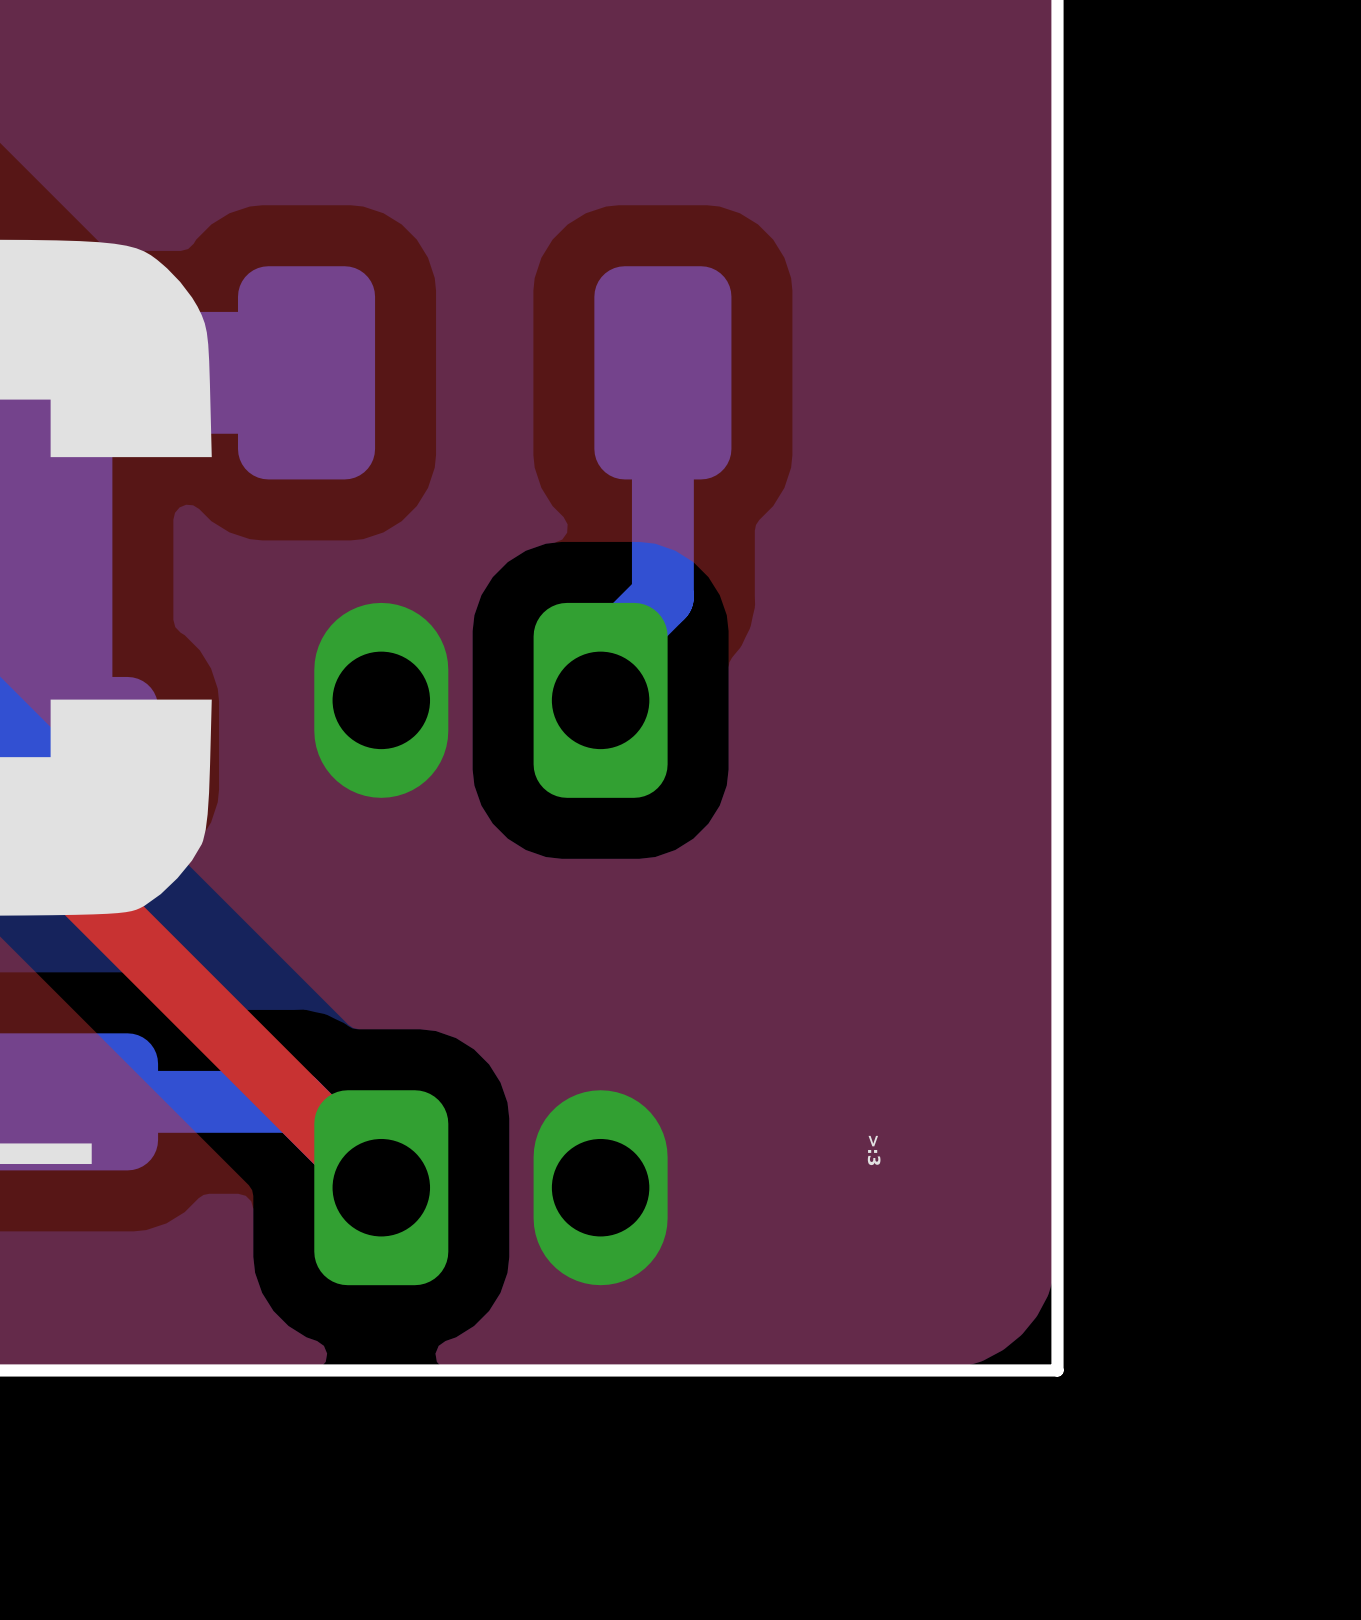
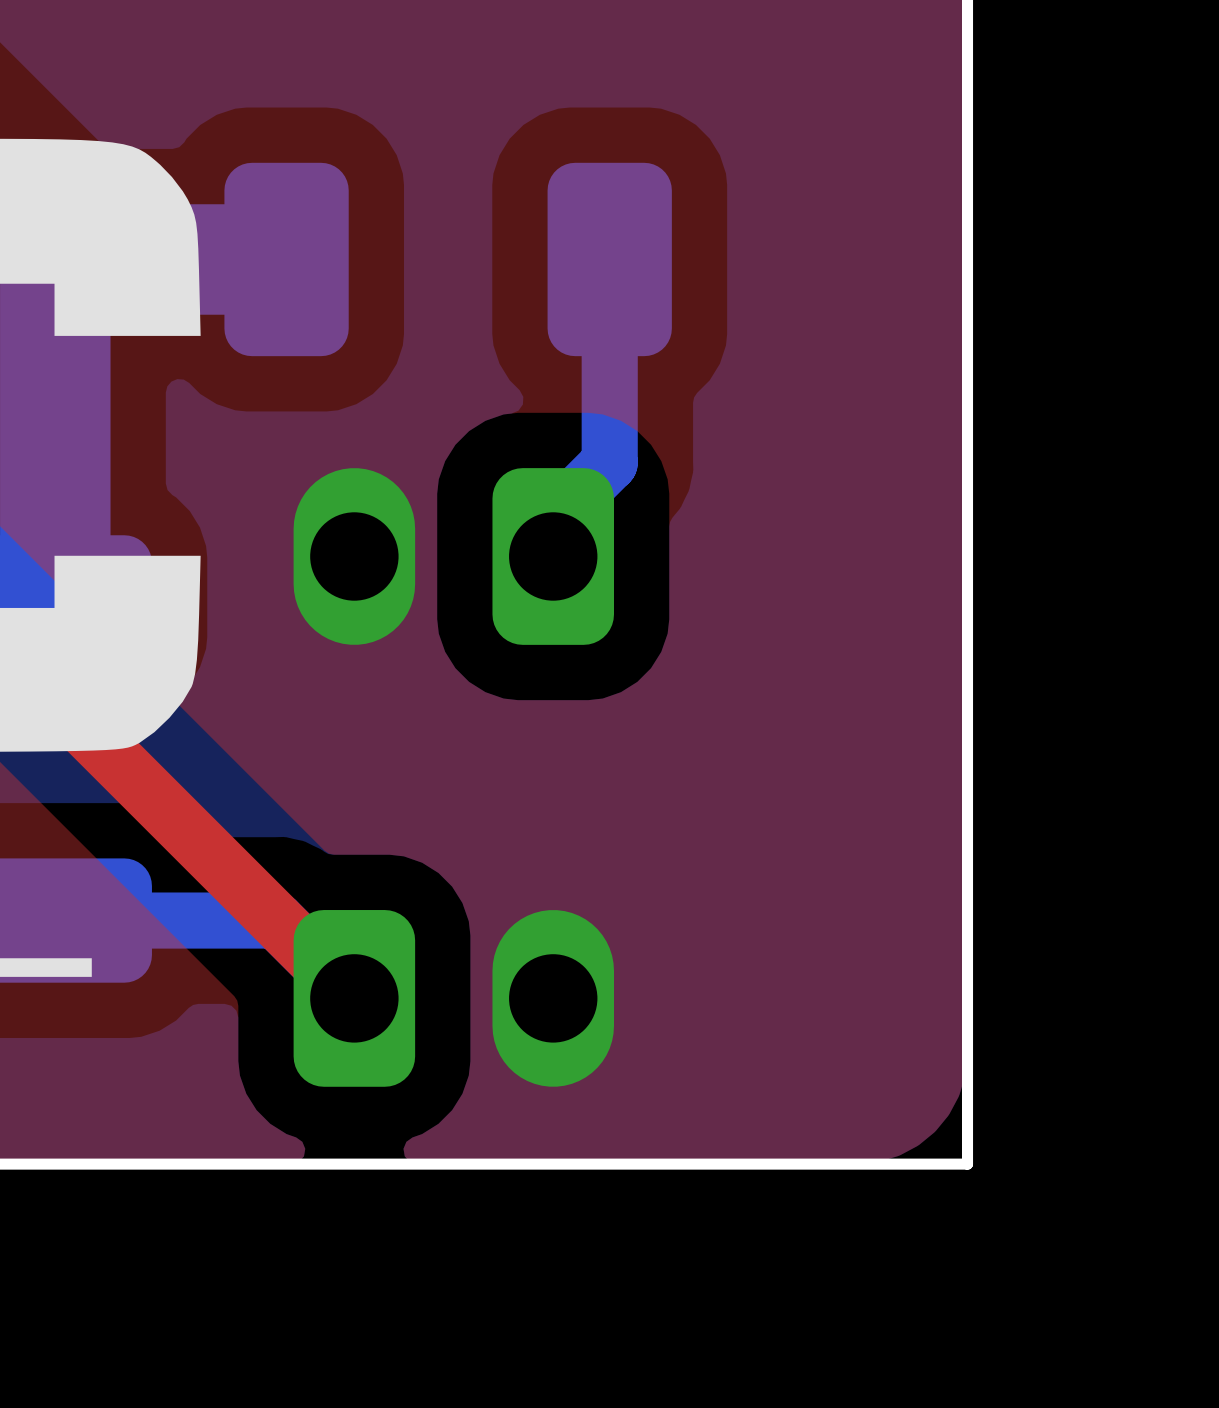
text: >:3 (874, 1150) -> none

